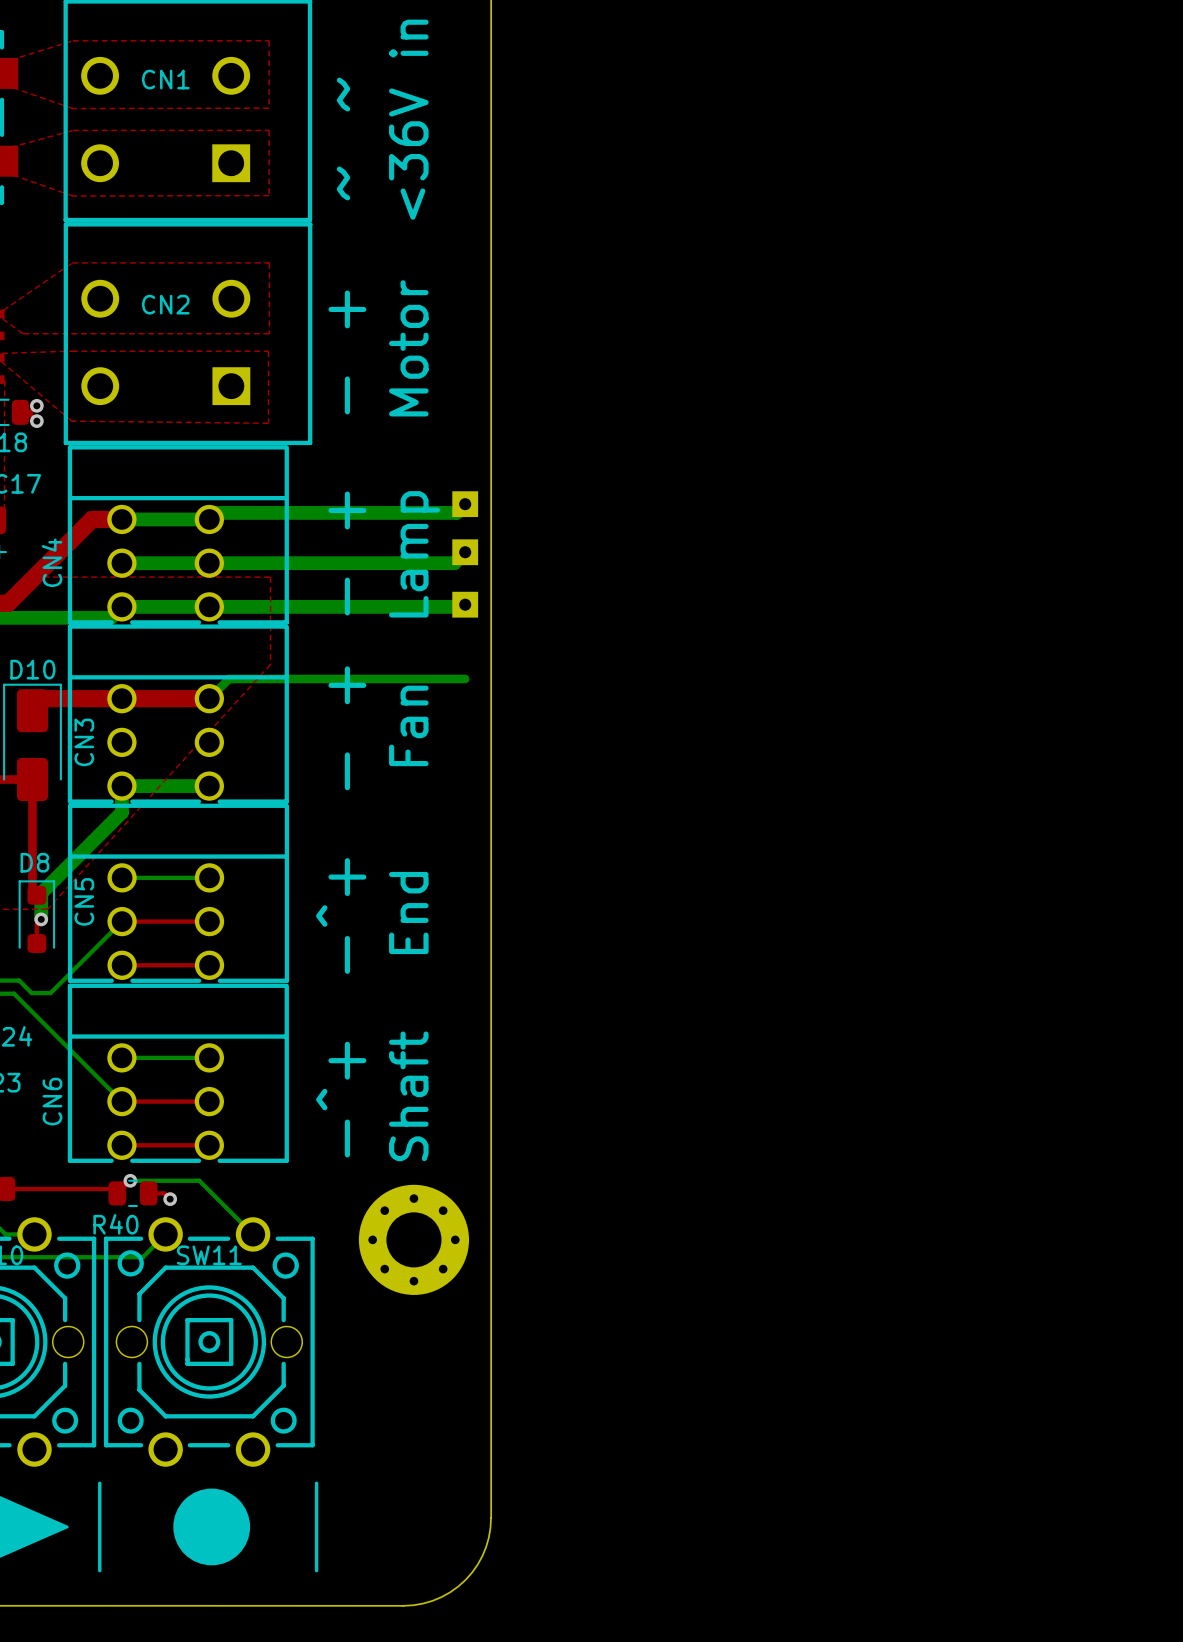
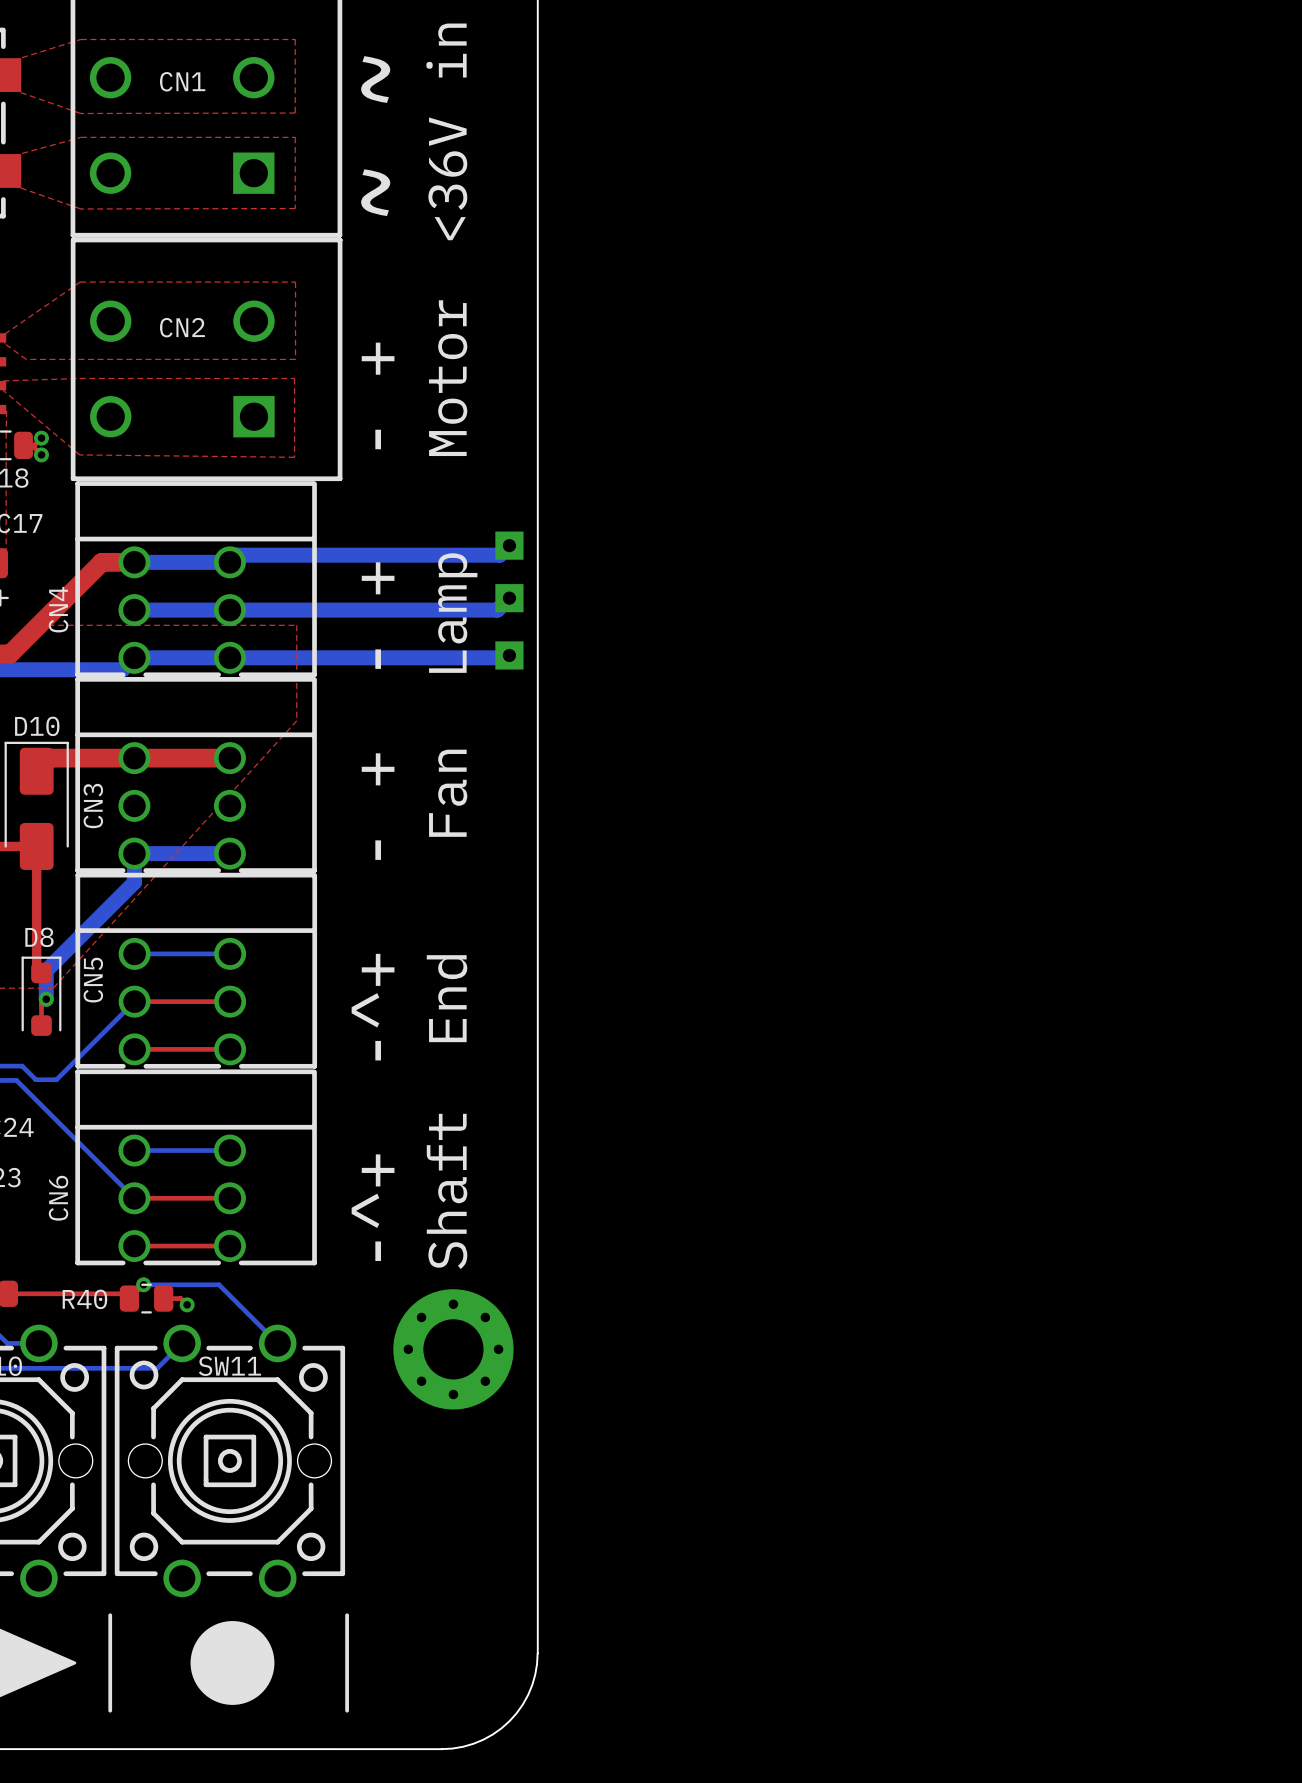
bottom track: (465, 679) (229, 679) (209, 698) -> none
R40 name position: R40 (115, 1224) -> R40 (84, 1299)

